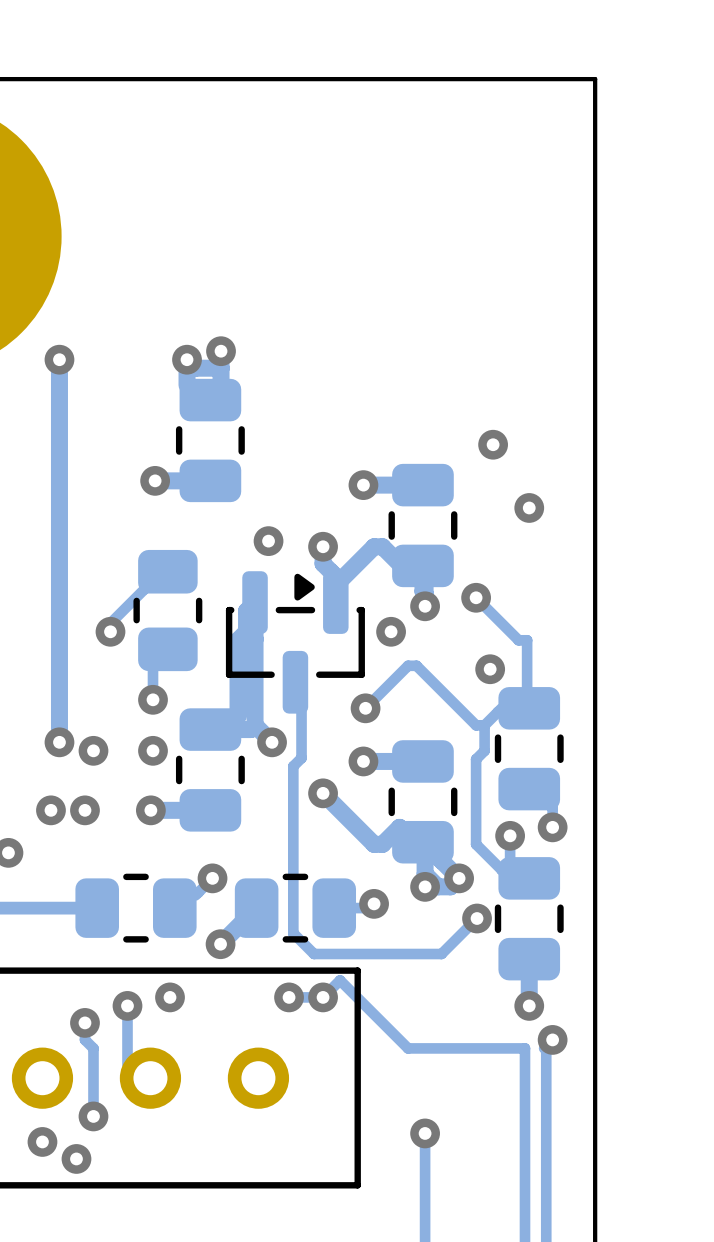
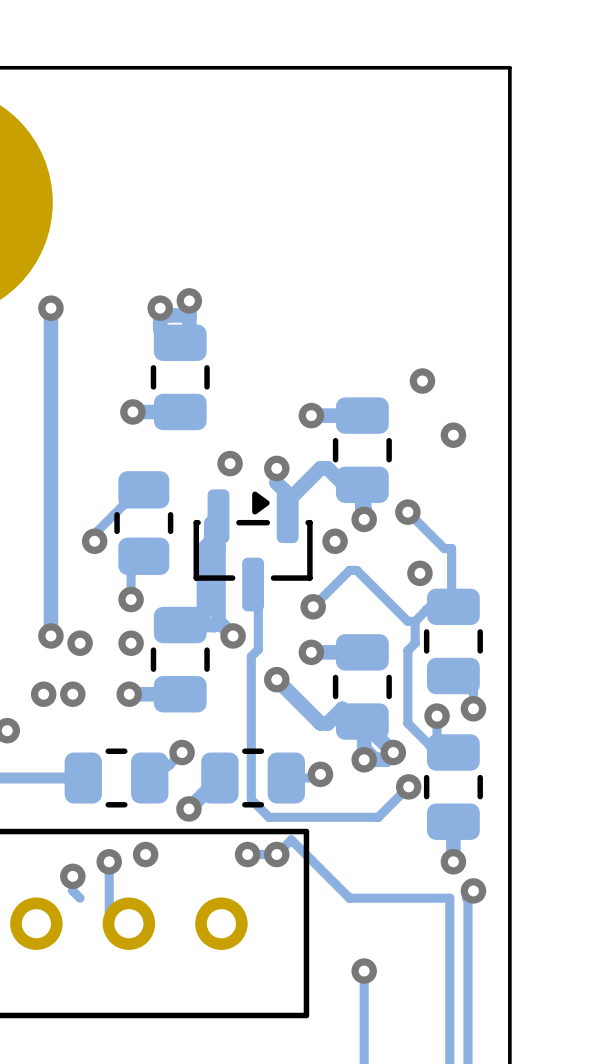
track: (93, 1048) (93, 1116) -> none
via: (93, 1116) -> none
via: (42, 1141) -> none
via: (76, 1158) -> none

